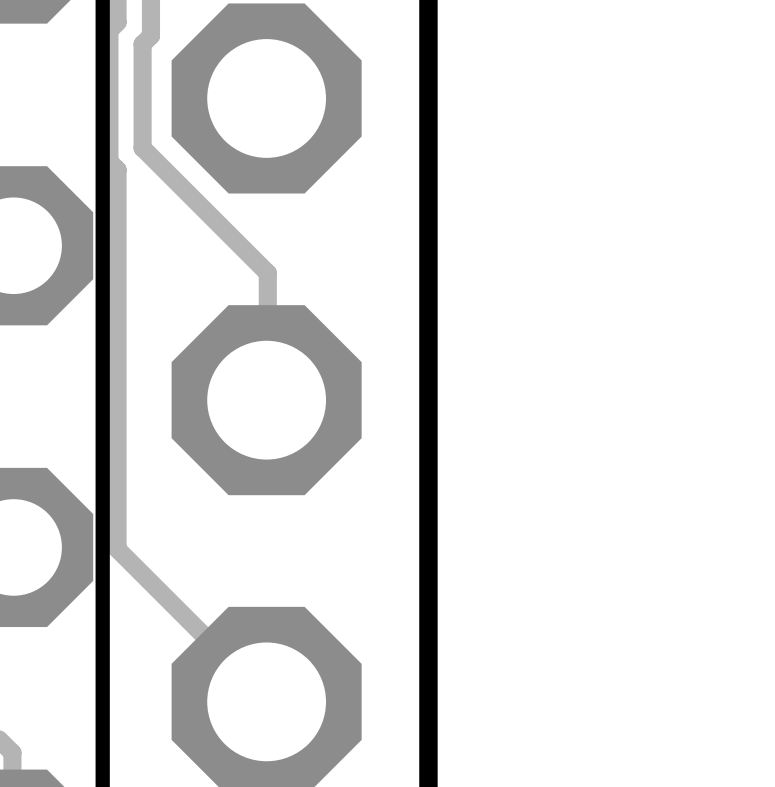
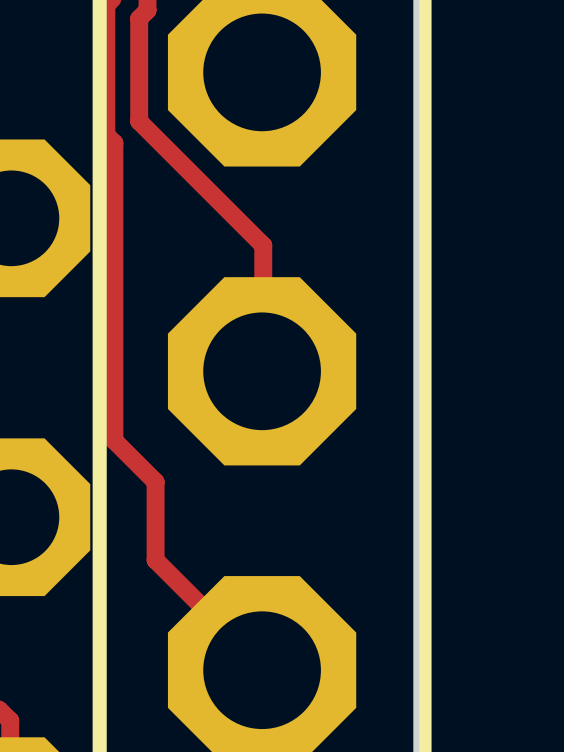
track: (117, 470) (117, 549) (159, 590) -> (114, 440) (155, 481) (155, 560)

